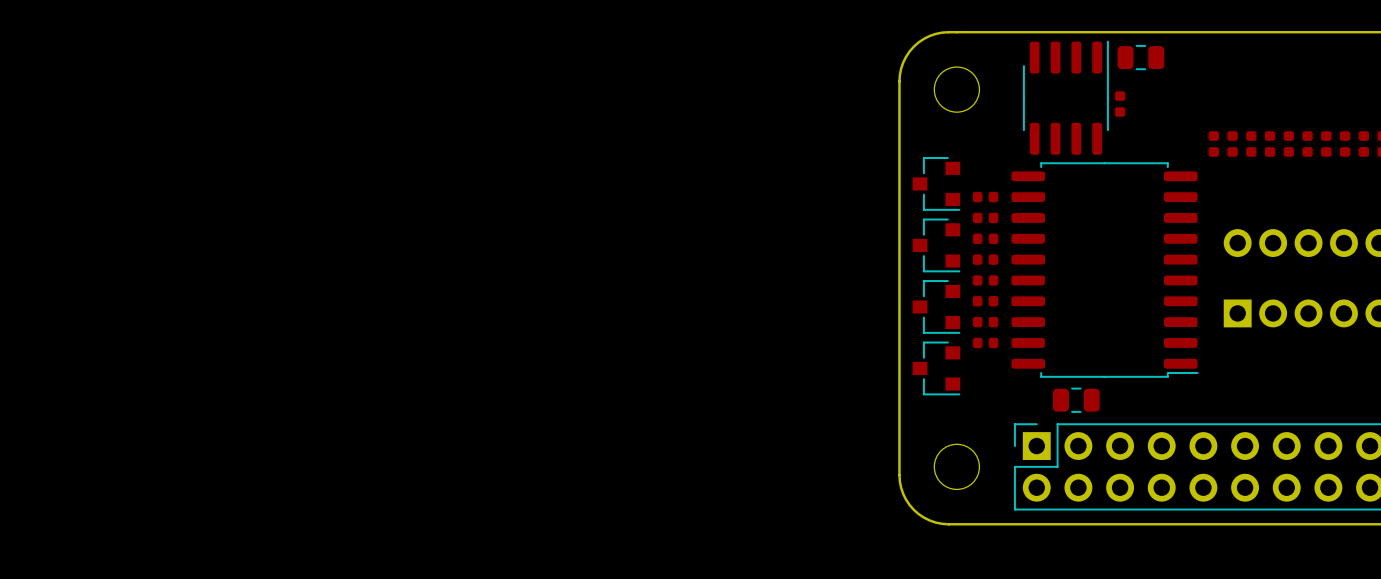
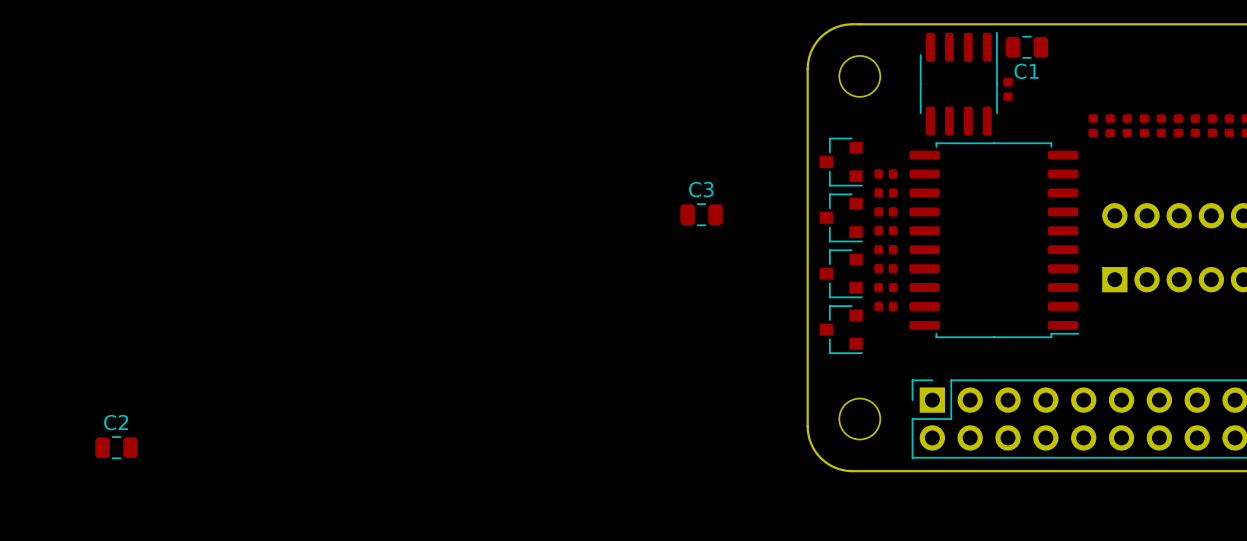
C1 name: none -> C1 (1026, 71)
C3: none -> (701, 214)
part: (1076, 400) -> none
C2: none -> (116, 447)

